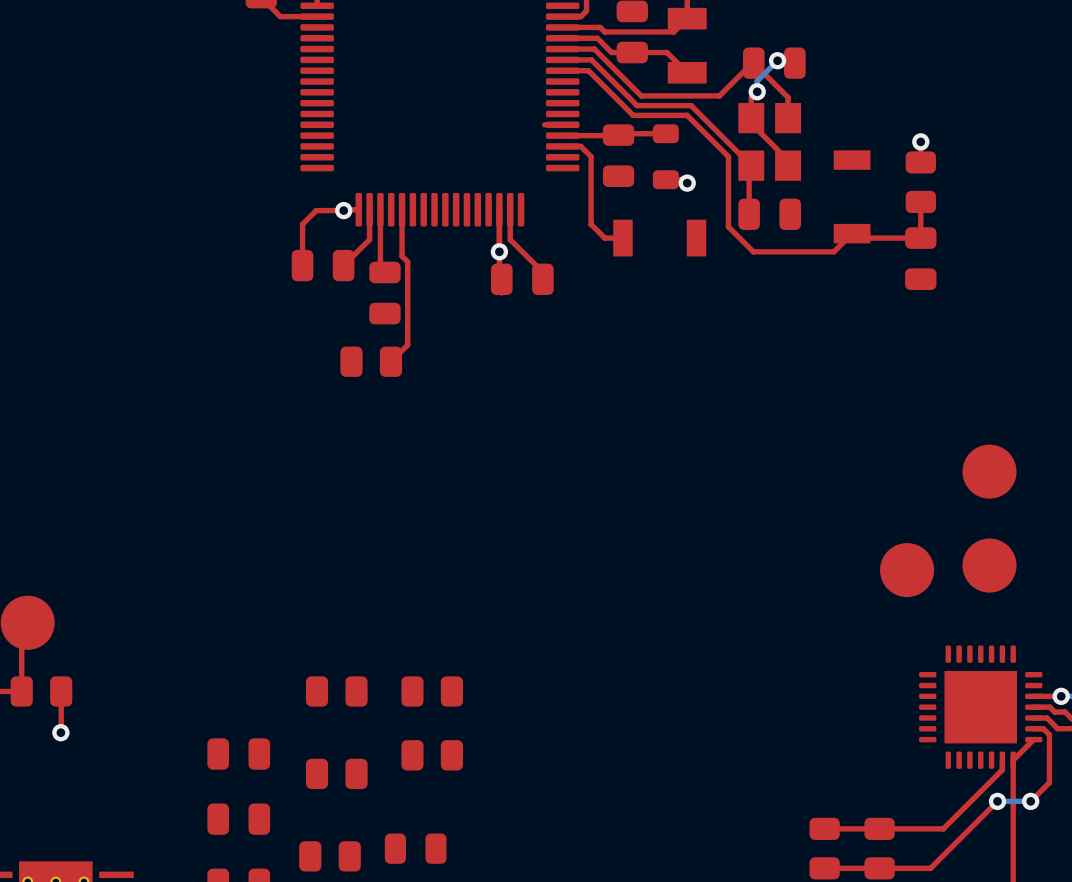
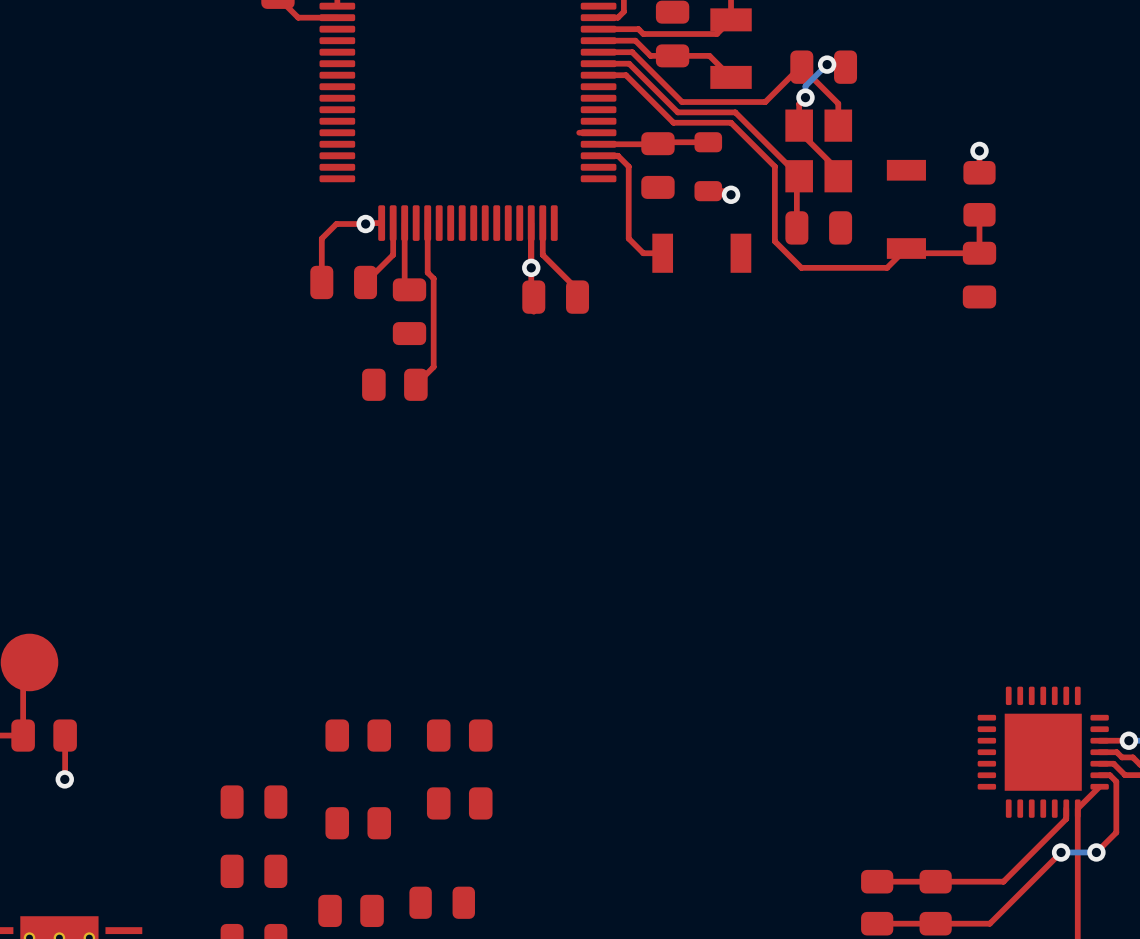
part: (989, 471) -> none
part: (989, 565) -> none
part: (907, 570) -> none

